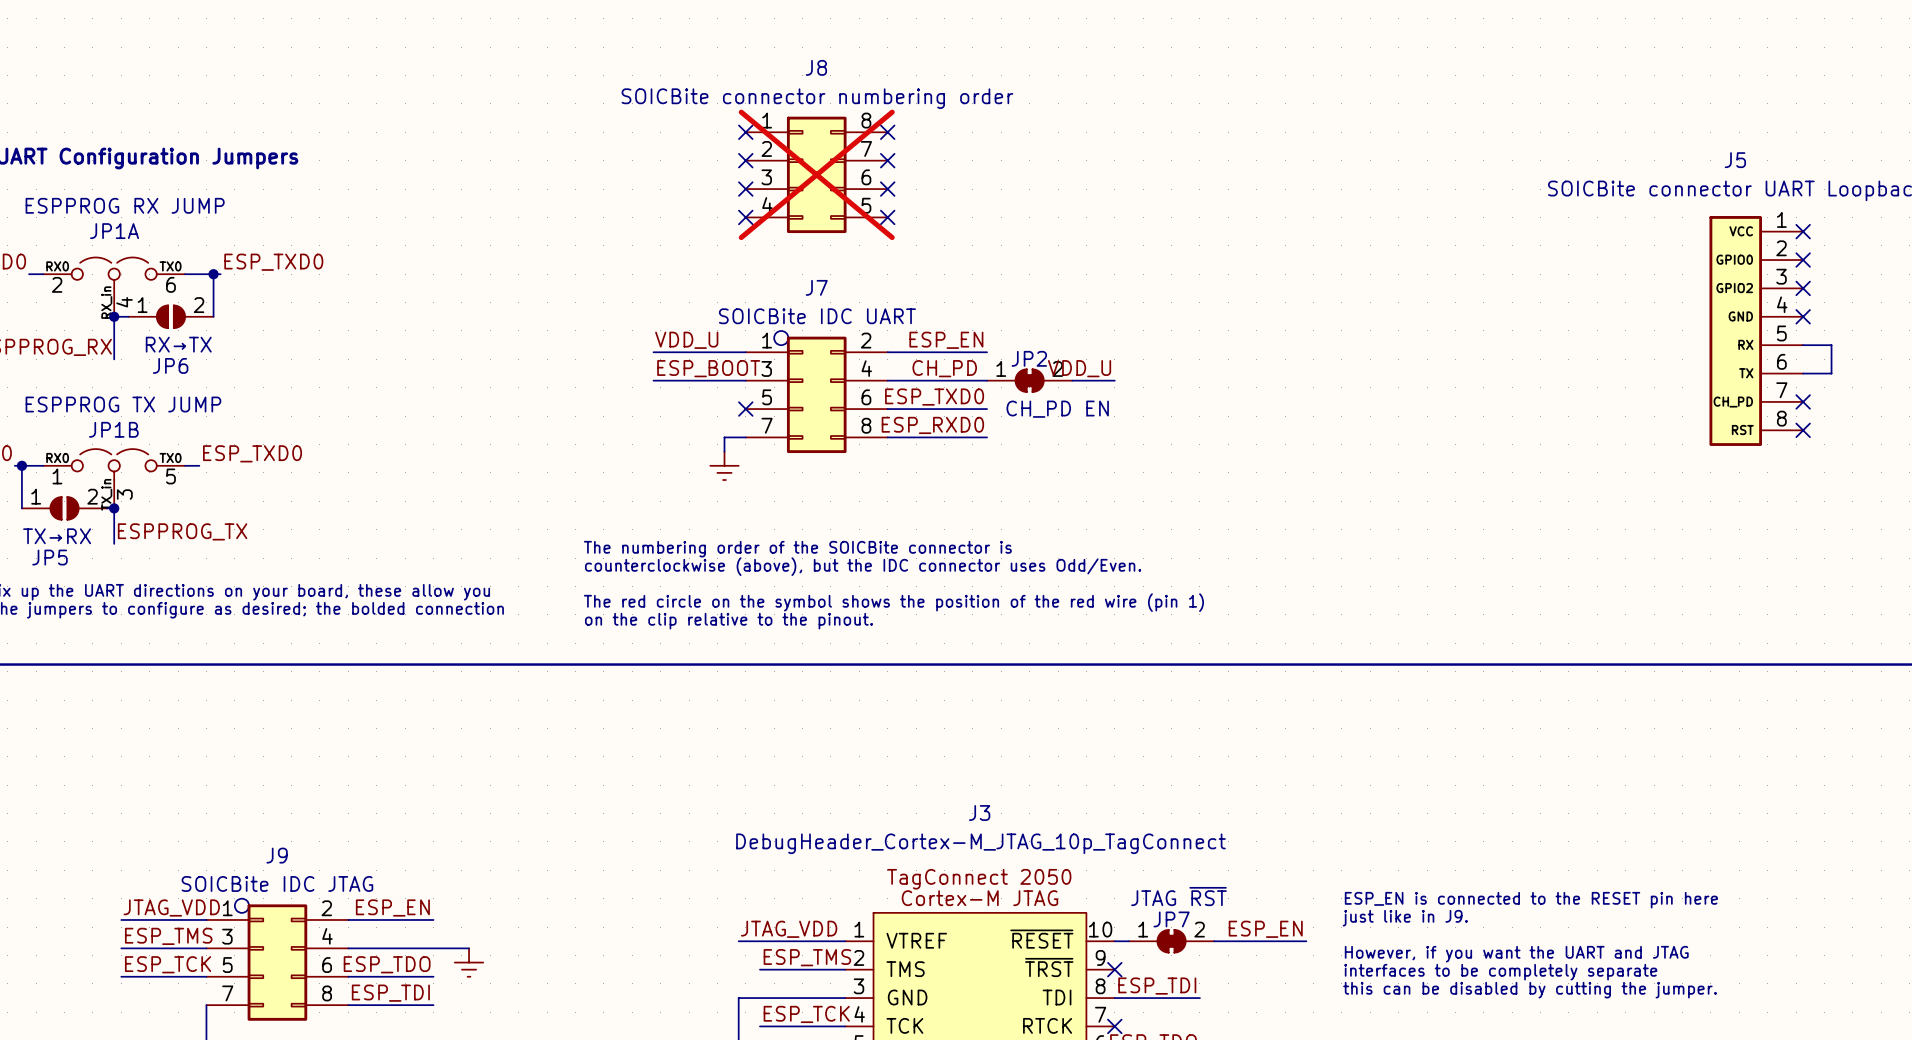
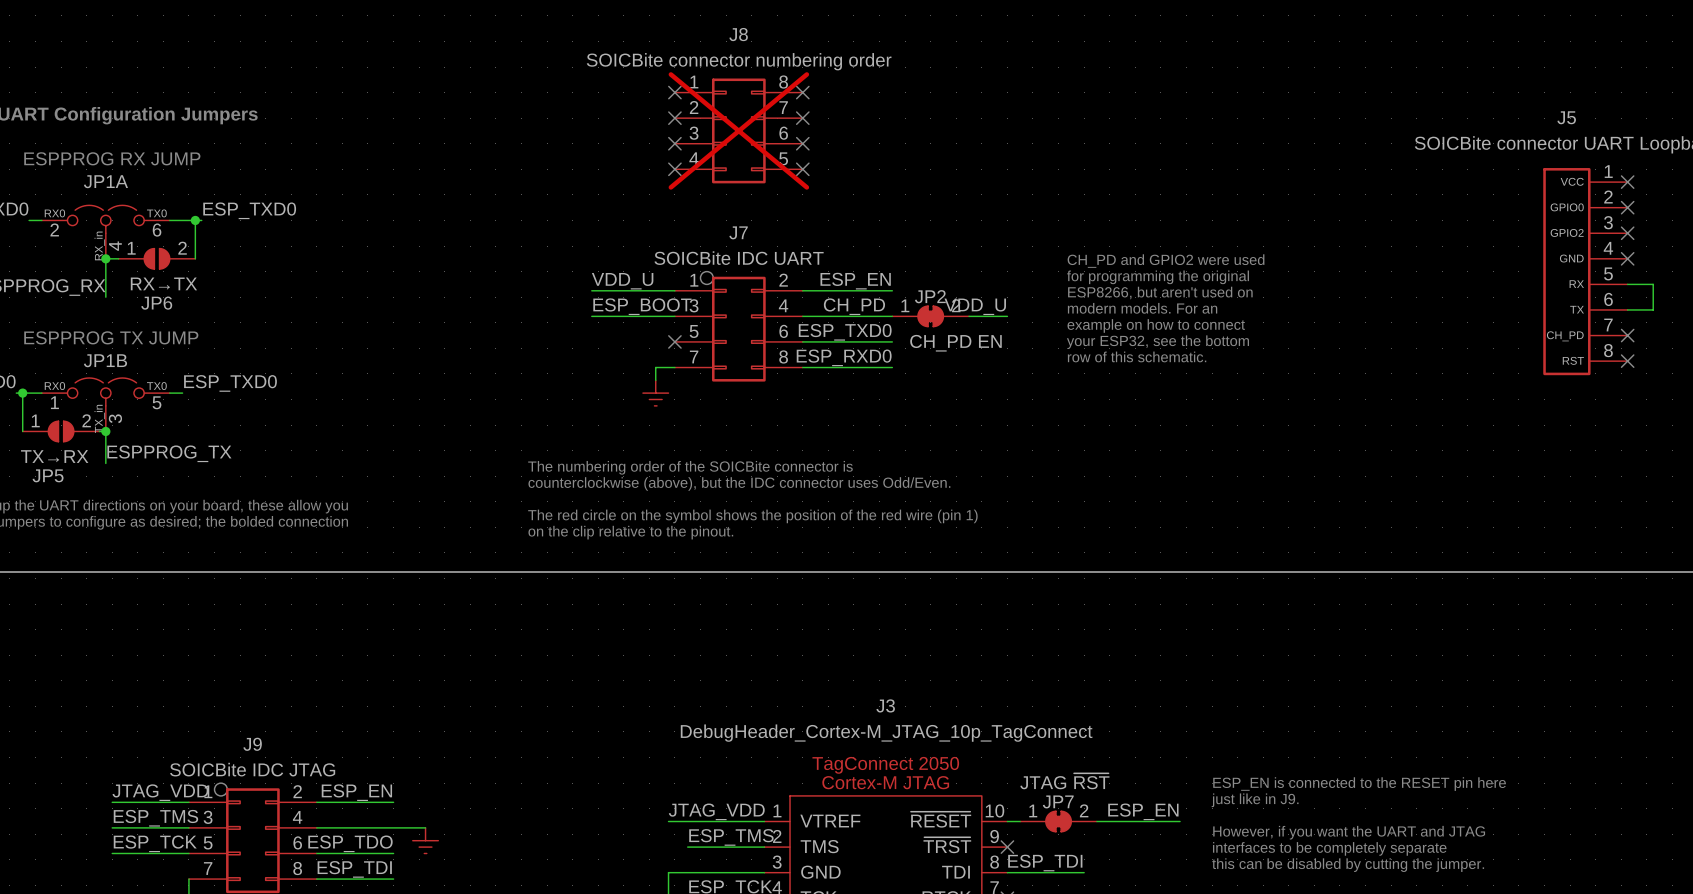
text: none -> CH_PD and GPIO2 were used (1166, 261)
text: none -> for programming the original (1158, 277)
text: none -> ESP8266, but aren't used on (1160, 292)
text: none -> modern models. For an (1142, 308)
text: none -> example on how to connect (1156, 325)
text: none -> your ESP32, see the bottom (1157, 342)
text: none -> row of this schematic. (1137, 356)

